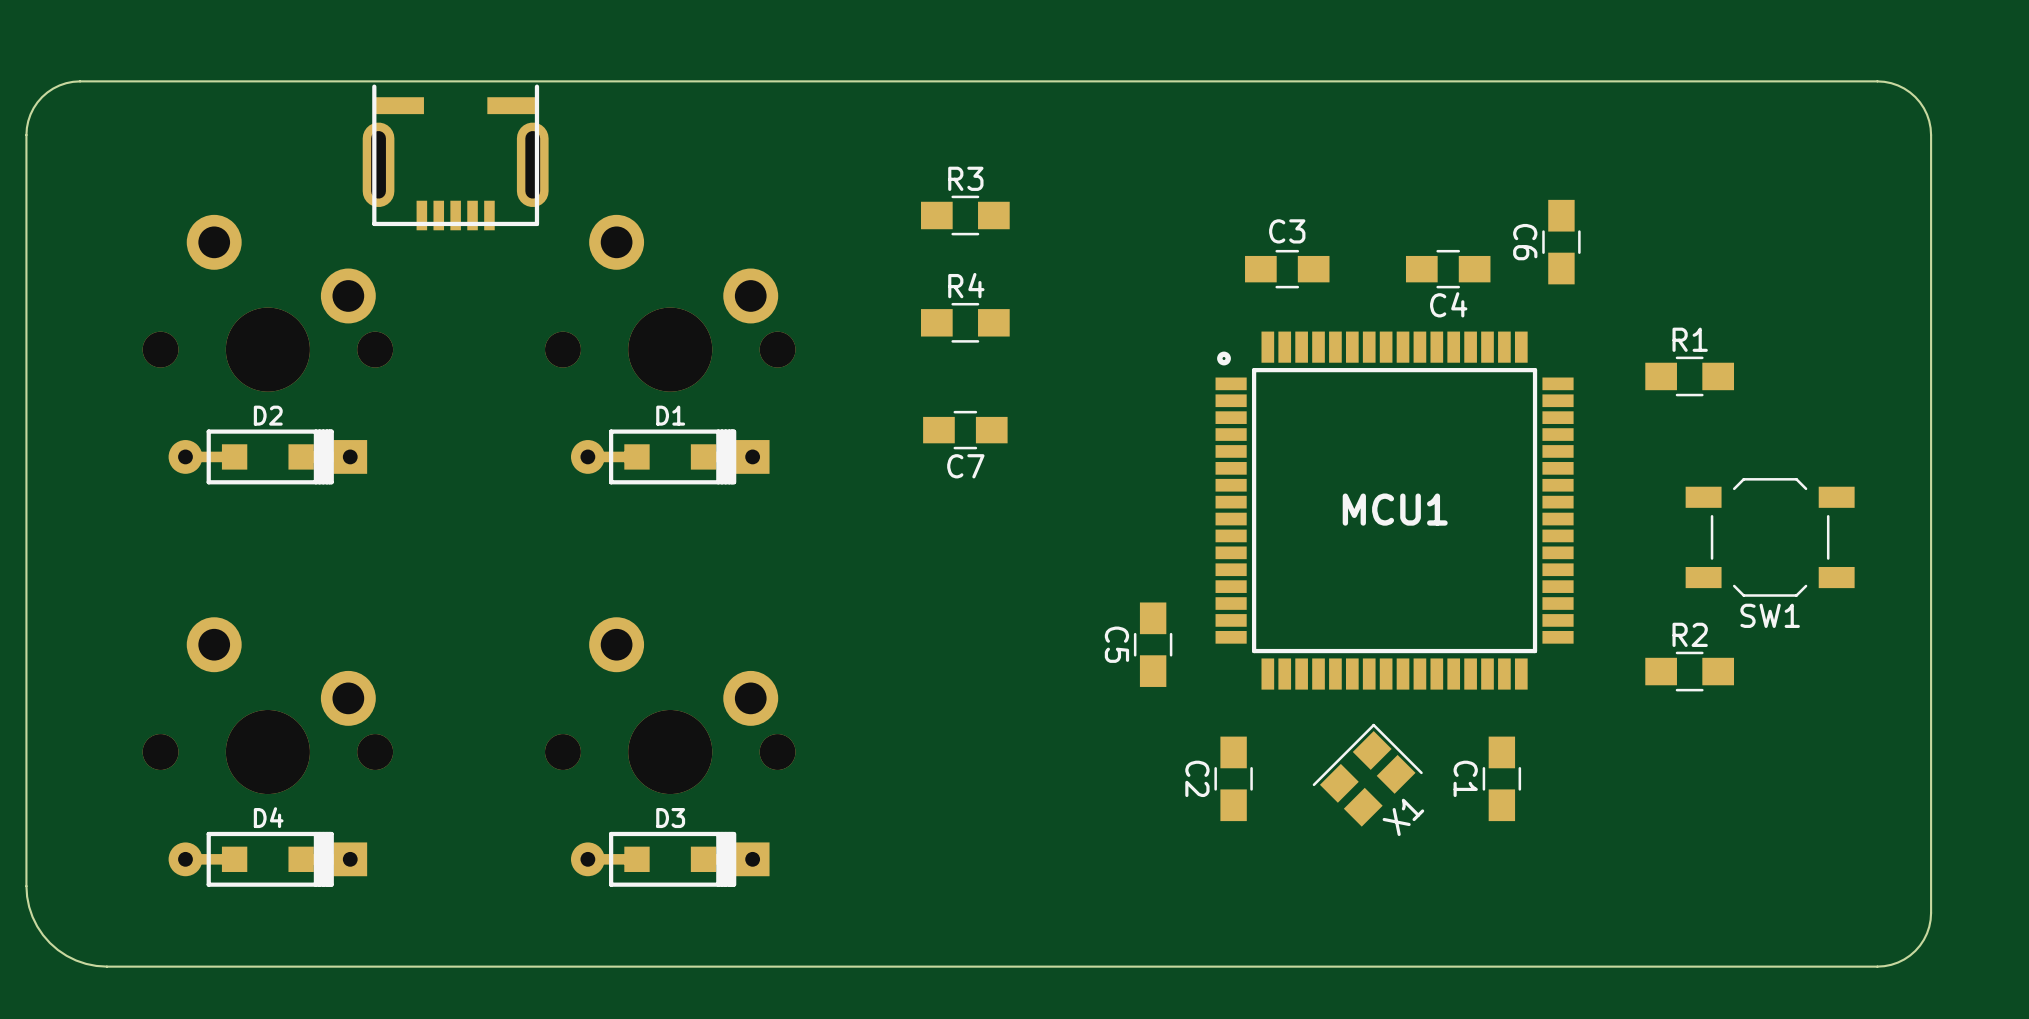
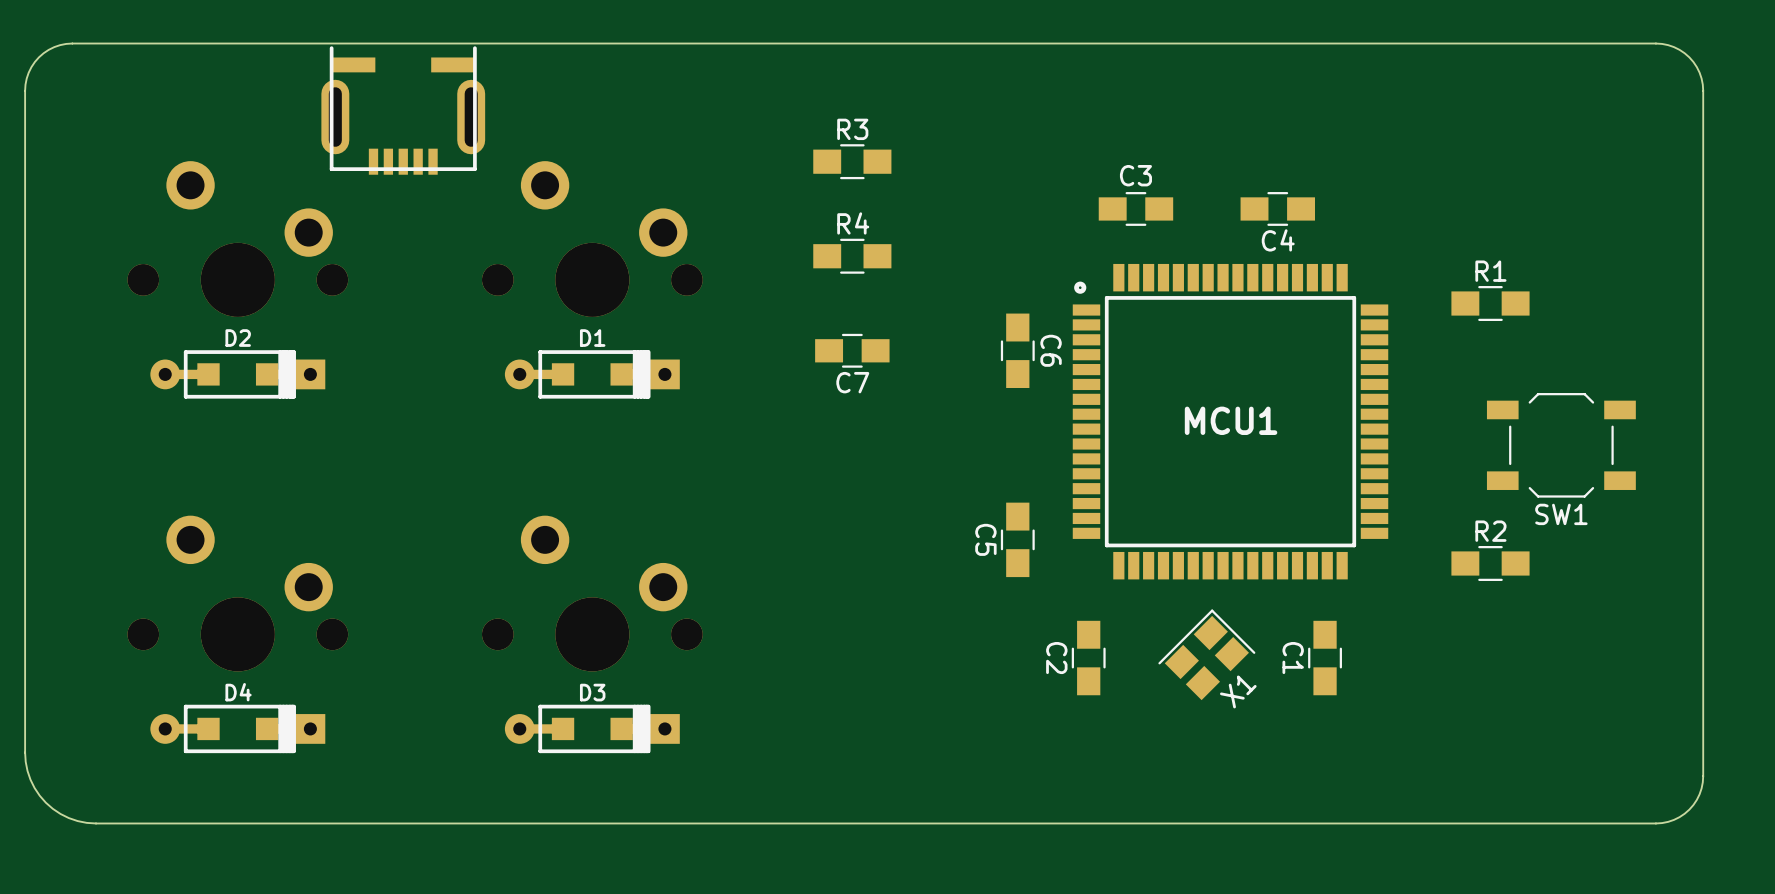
C6 name position: C6 (1525, 242) -> C6 (1051, 350)
C6 position: (1561, 242) -> (1017, 350)

